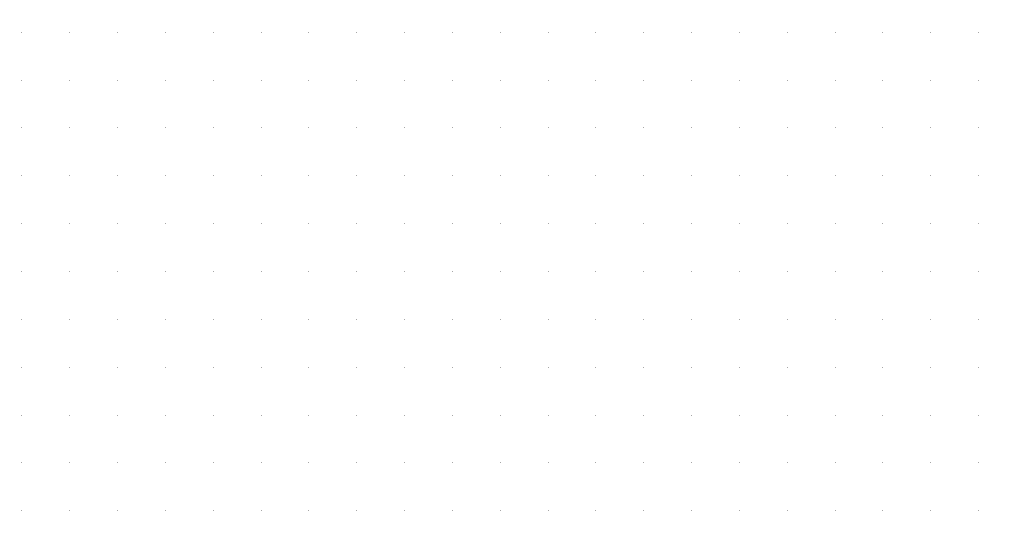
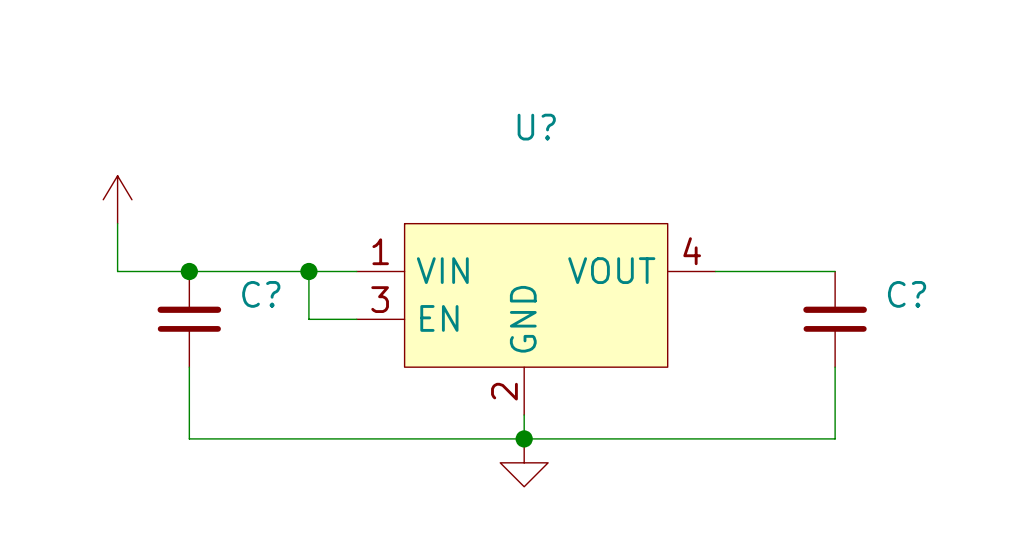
power symbol: none -> (117, 199)
wire: none -> (117, 223) (117, 271) (356, 271)
junction: none -> (189, 271)
wire: none -> (308, 271) (308, 319) (356, 319)
junction: none -> (308, 271)
wire: none -> (715, 271) (835, 271)
C?: none -> (189, 319)
U?: none -> (536, 319)
C?: none -> (835, 319)
wire: none -> (189, 367) (189, 438) (835, 438) (835, 367)
wire: none -> (524, 415) (524, 438)
junction: none -> (524, 438)
power symbol: none -> (524, 462)

